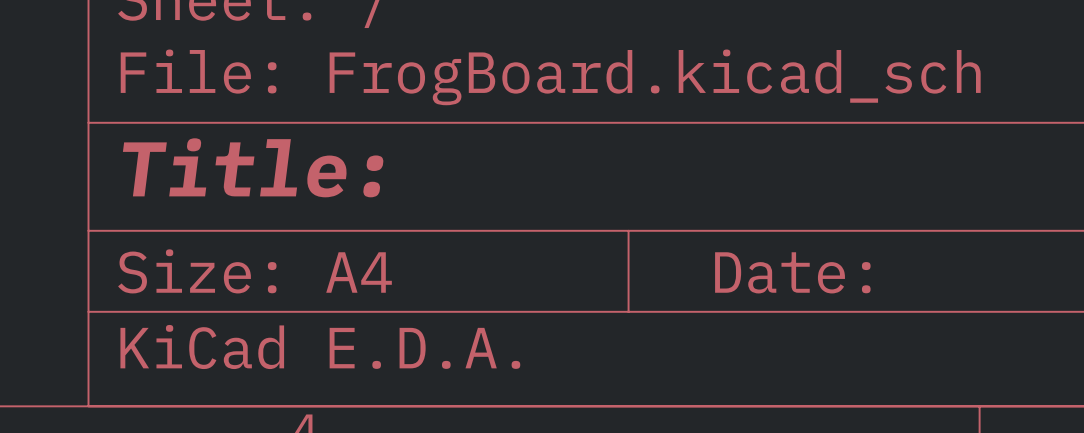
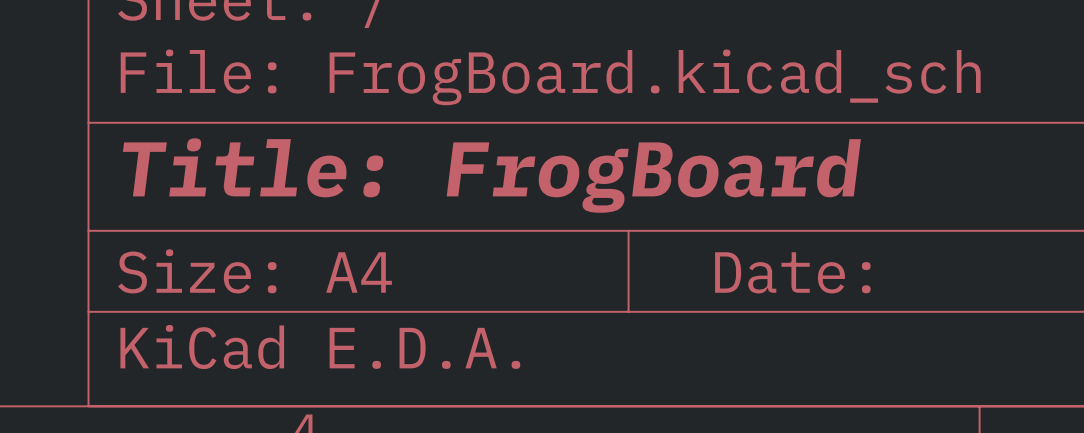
title block: Title: (253, 167) -> Title: FrogBoard (491, 175)

